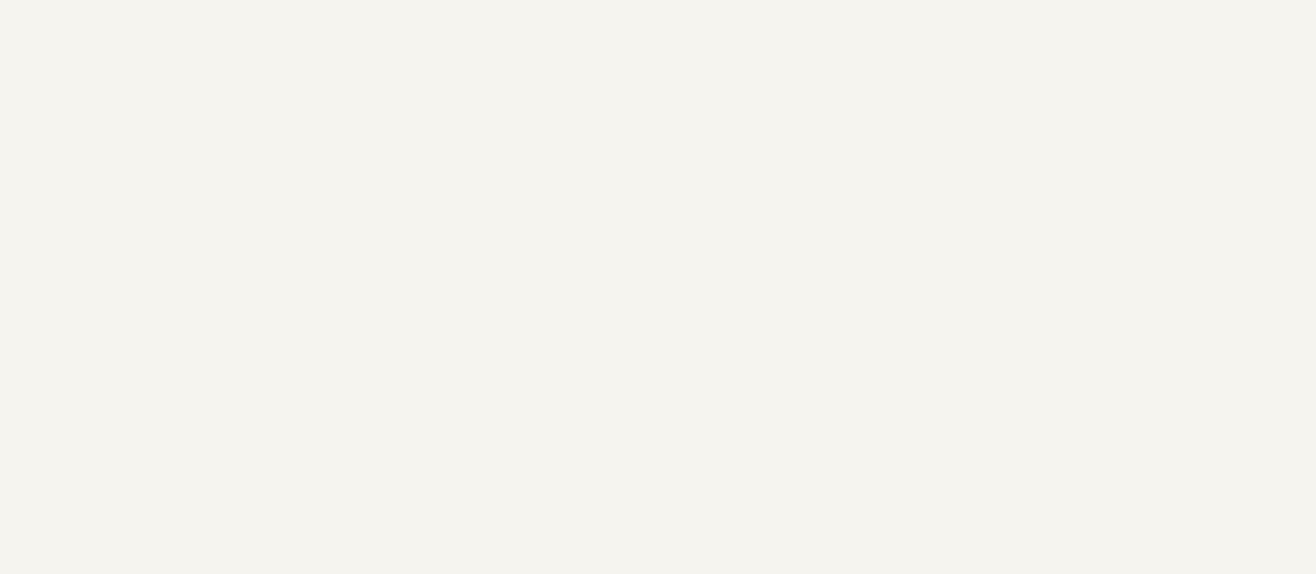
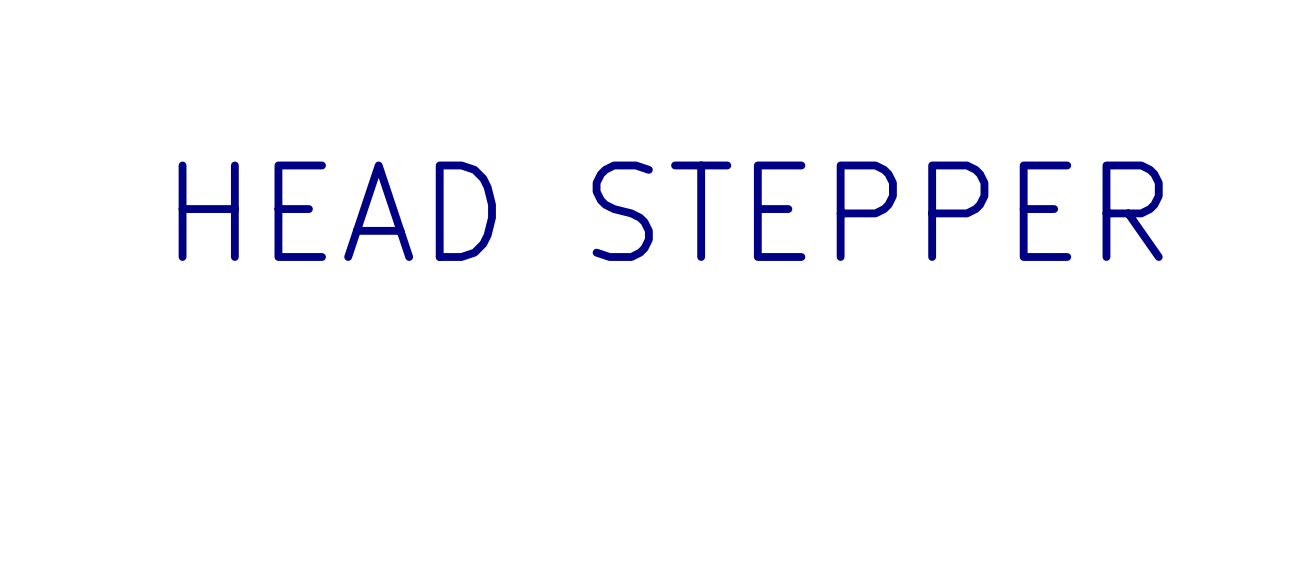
text: none -> HEAD STEPPER (670, 211)

